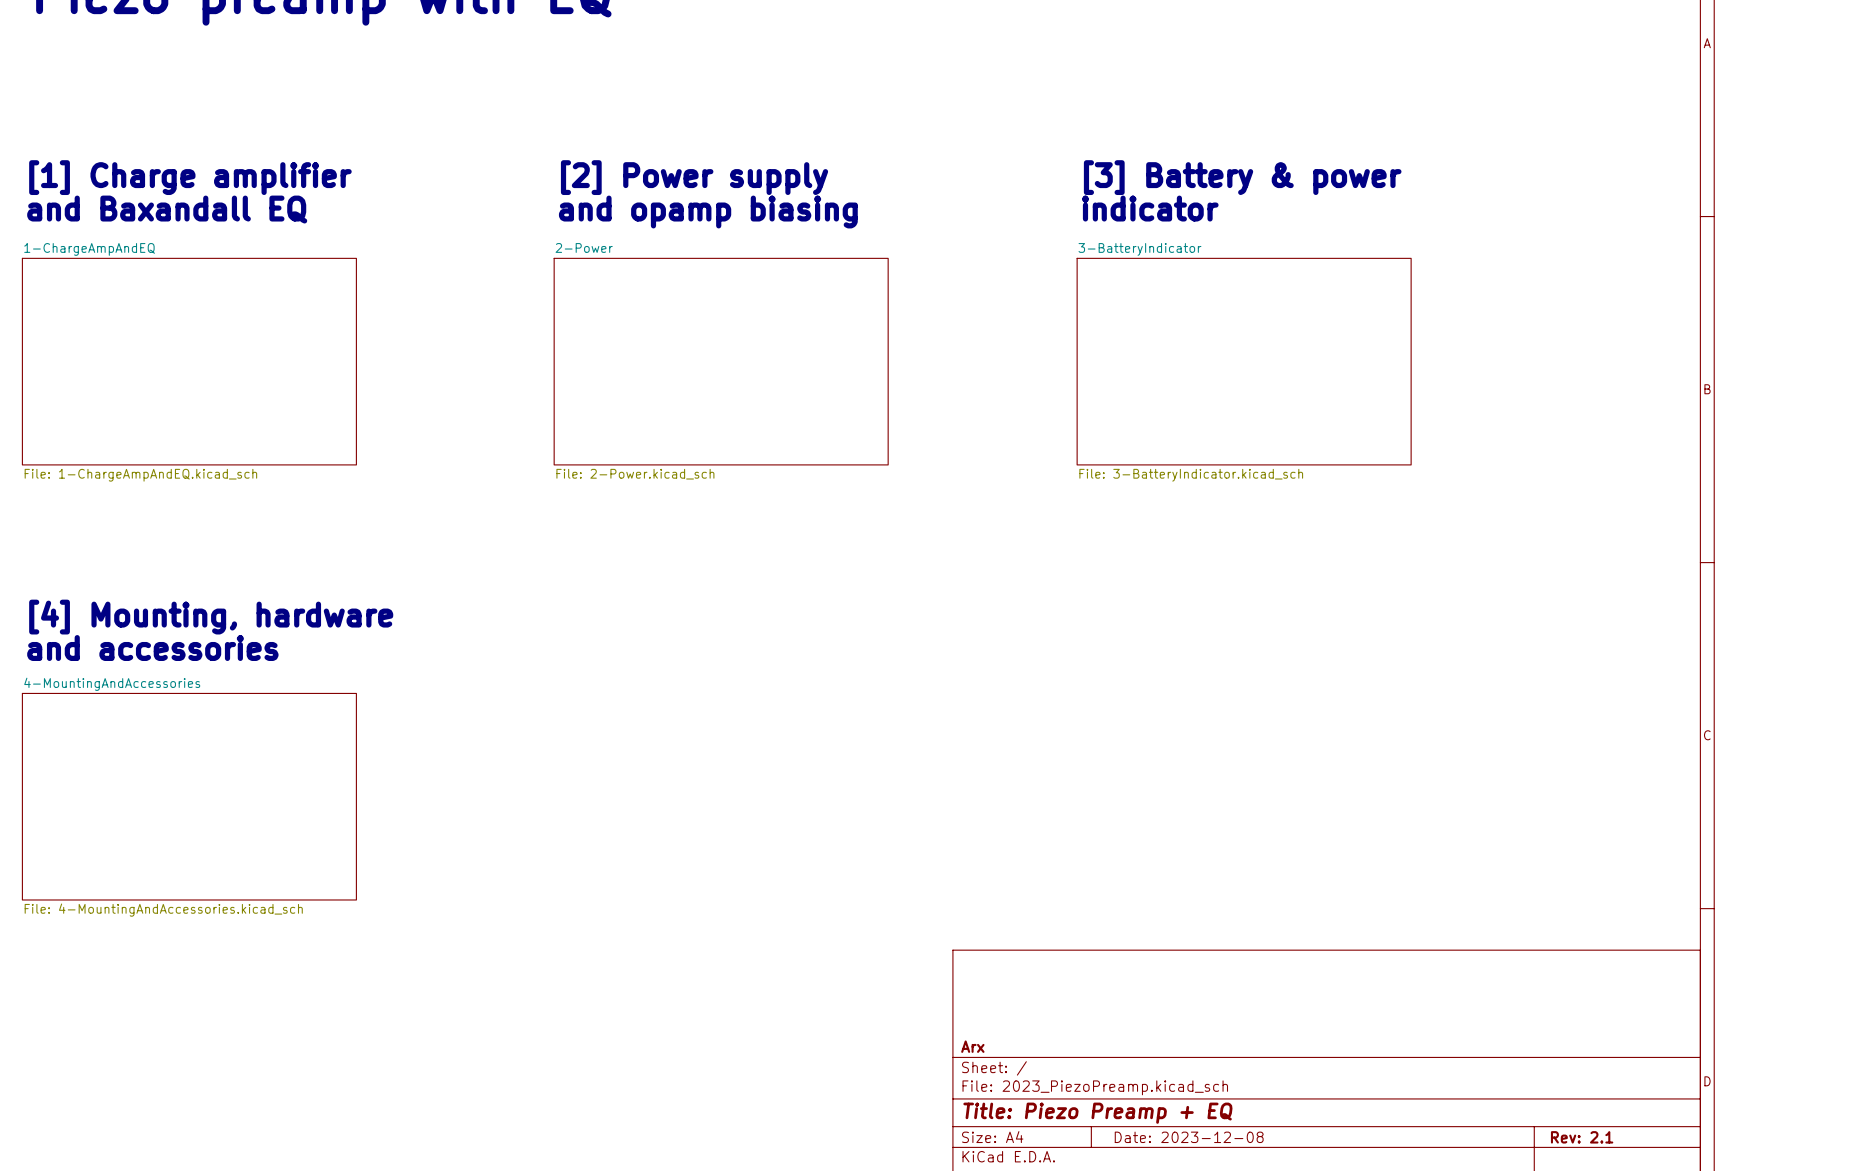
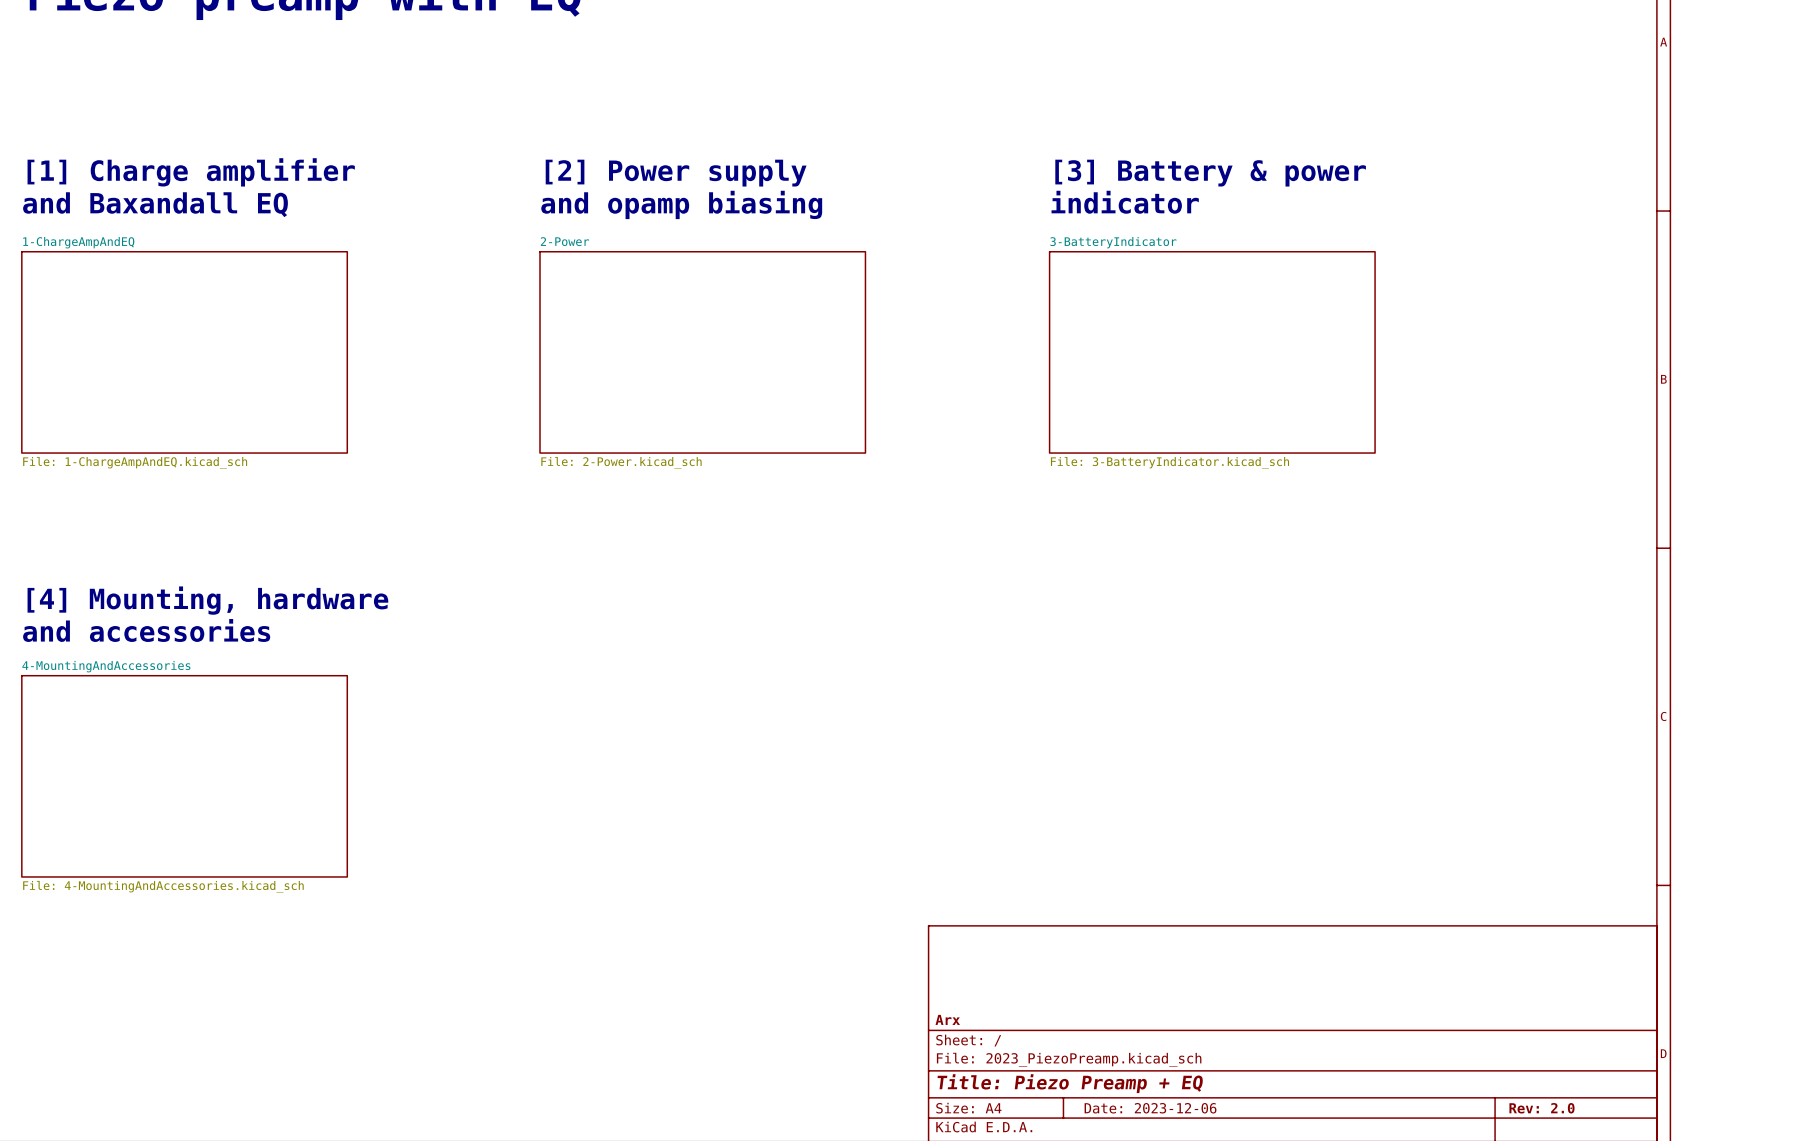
title block: Date: 2023-12-08 (1189, 1137) -> Date: 2023-12-06 (1150, 1108)
title block: Rev: 2.1 (1582, 1137) -> Rev: 2.0 (1541, 1108)

